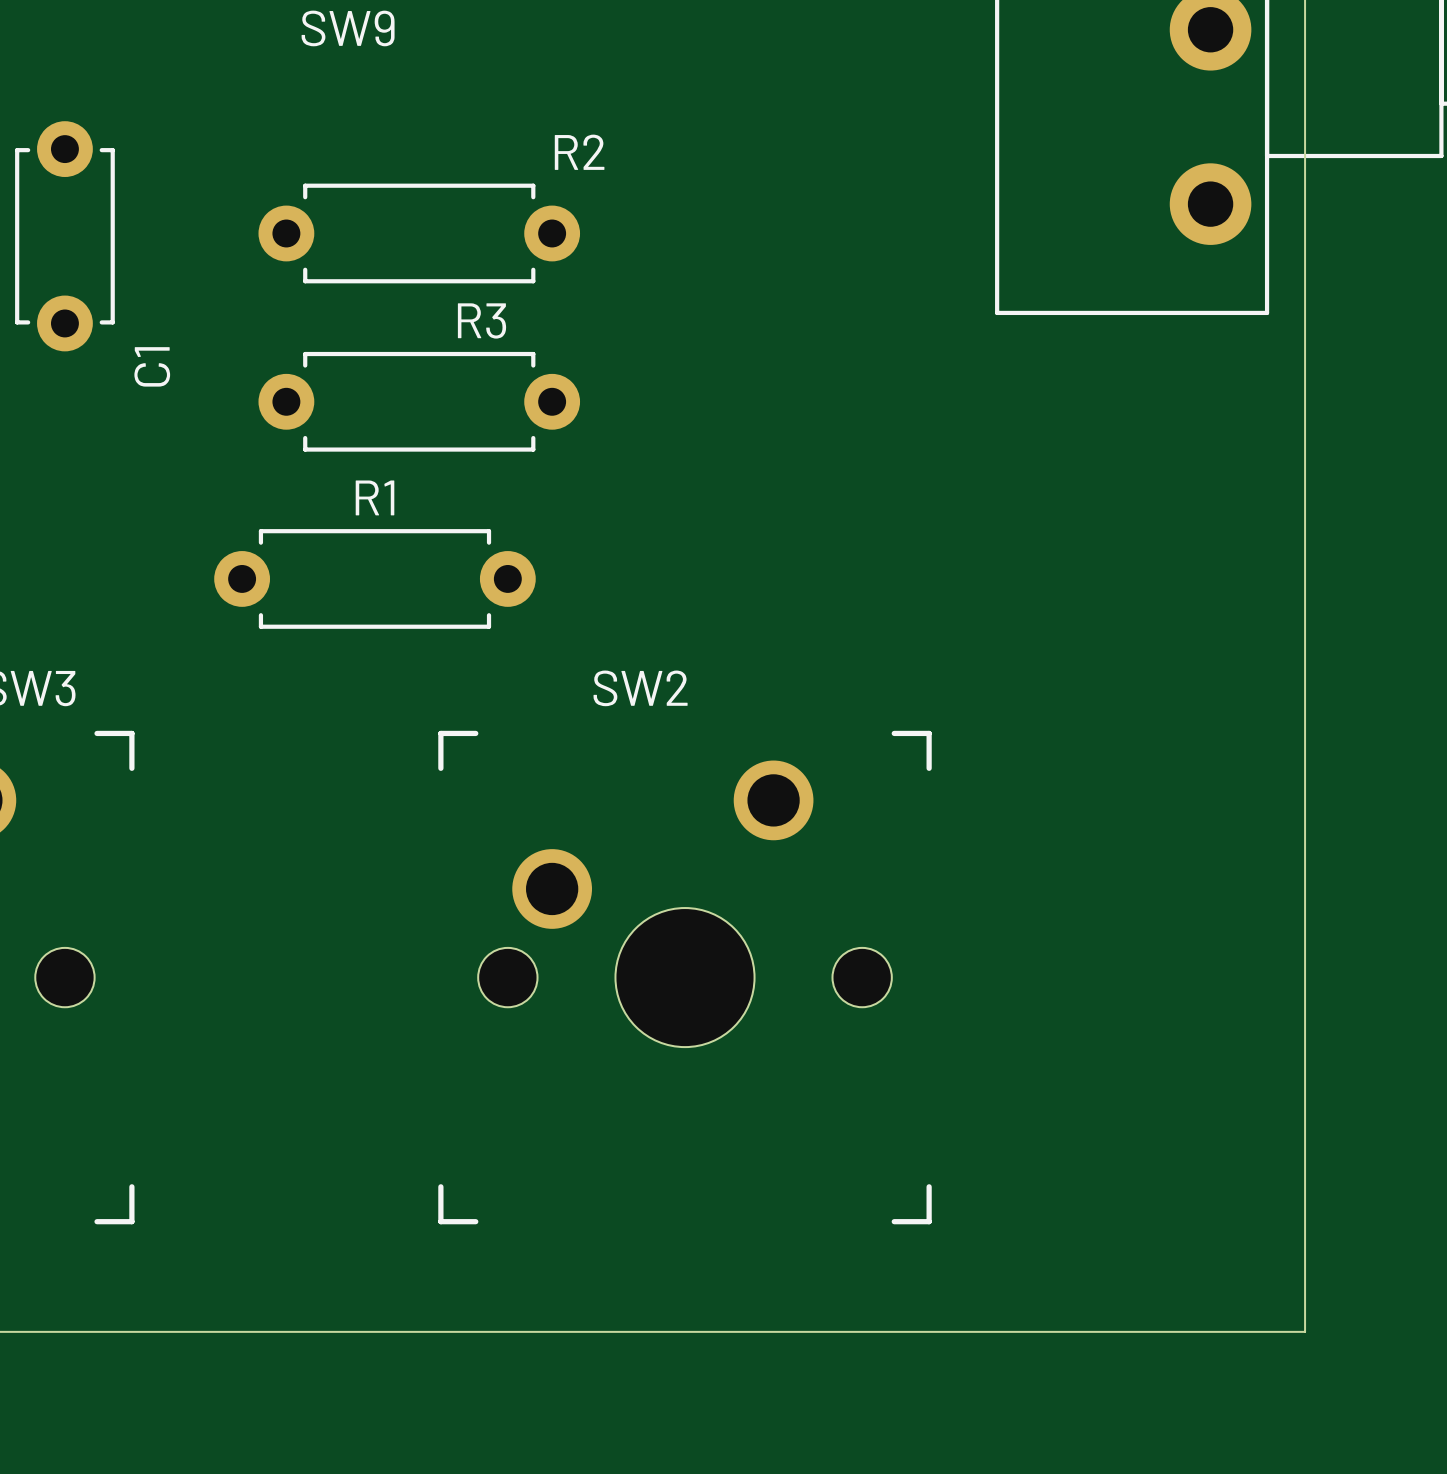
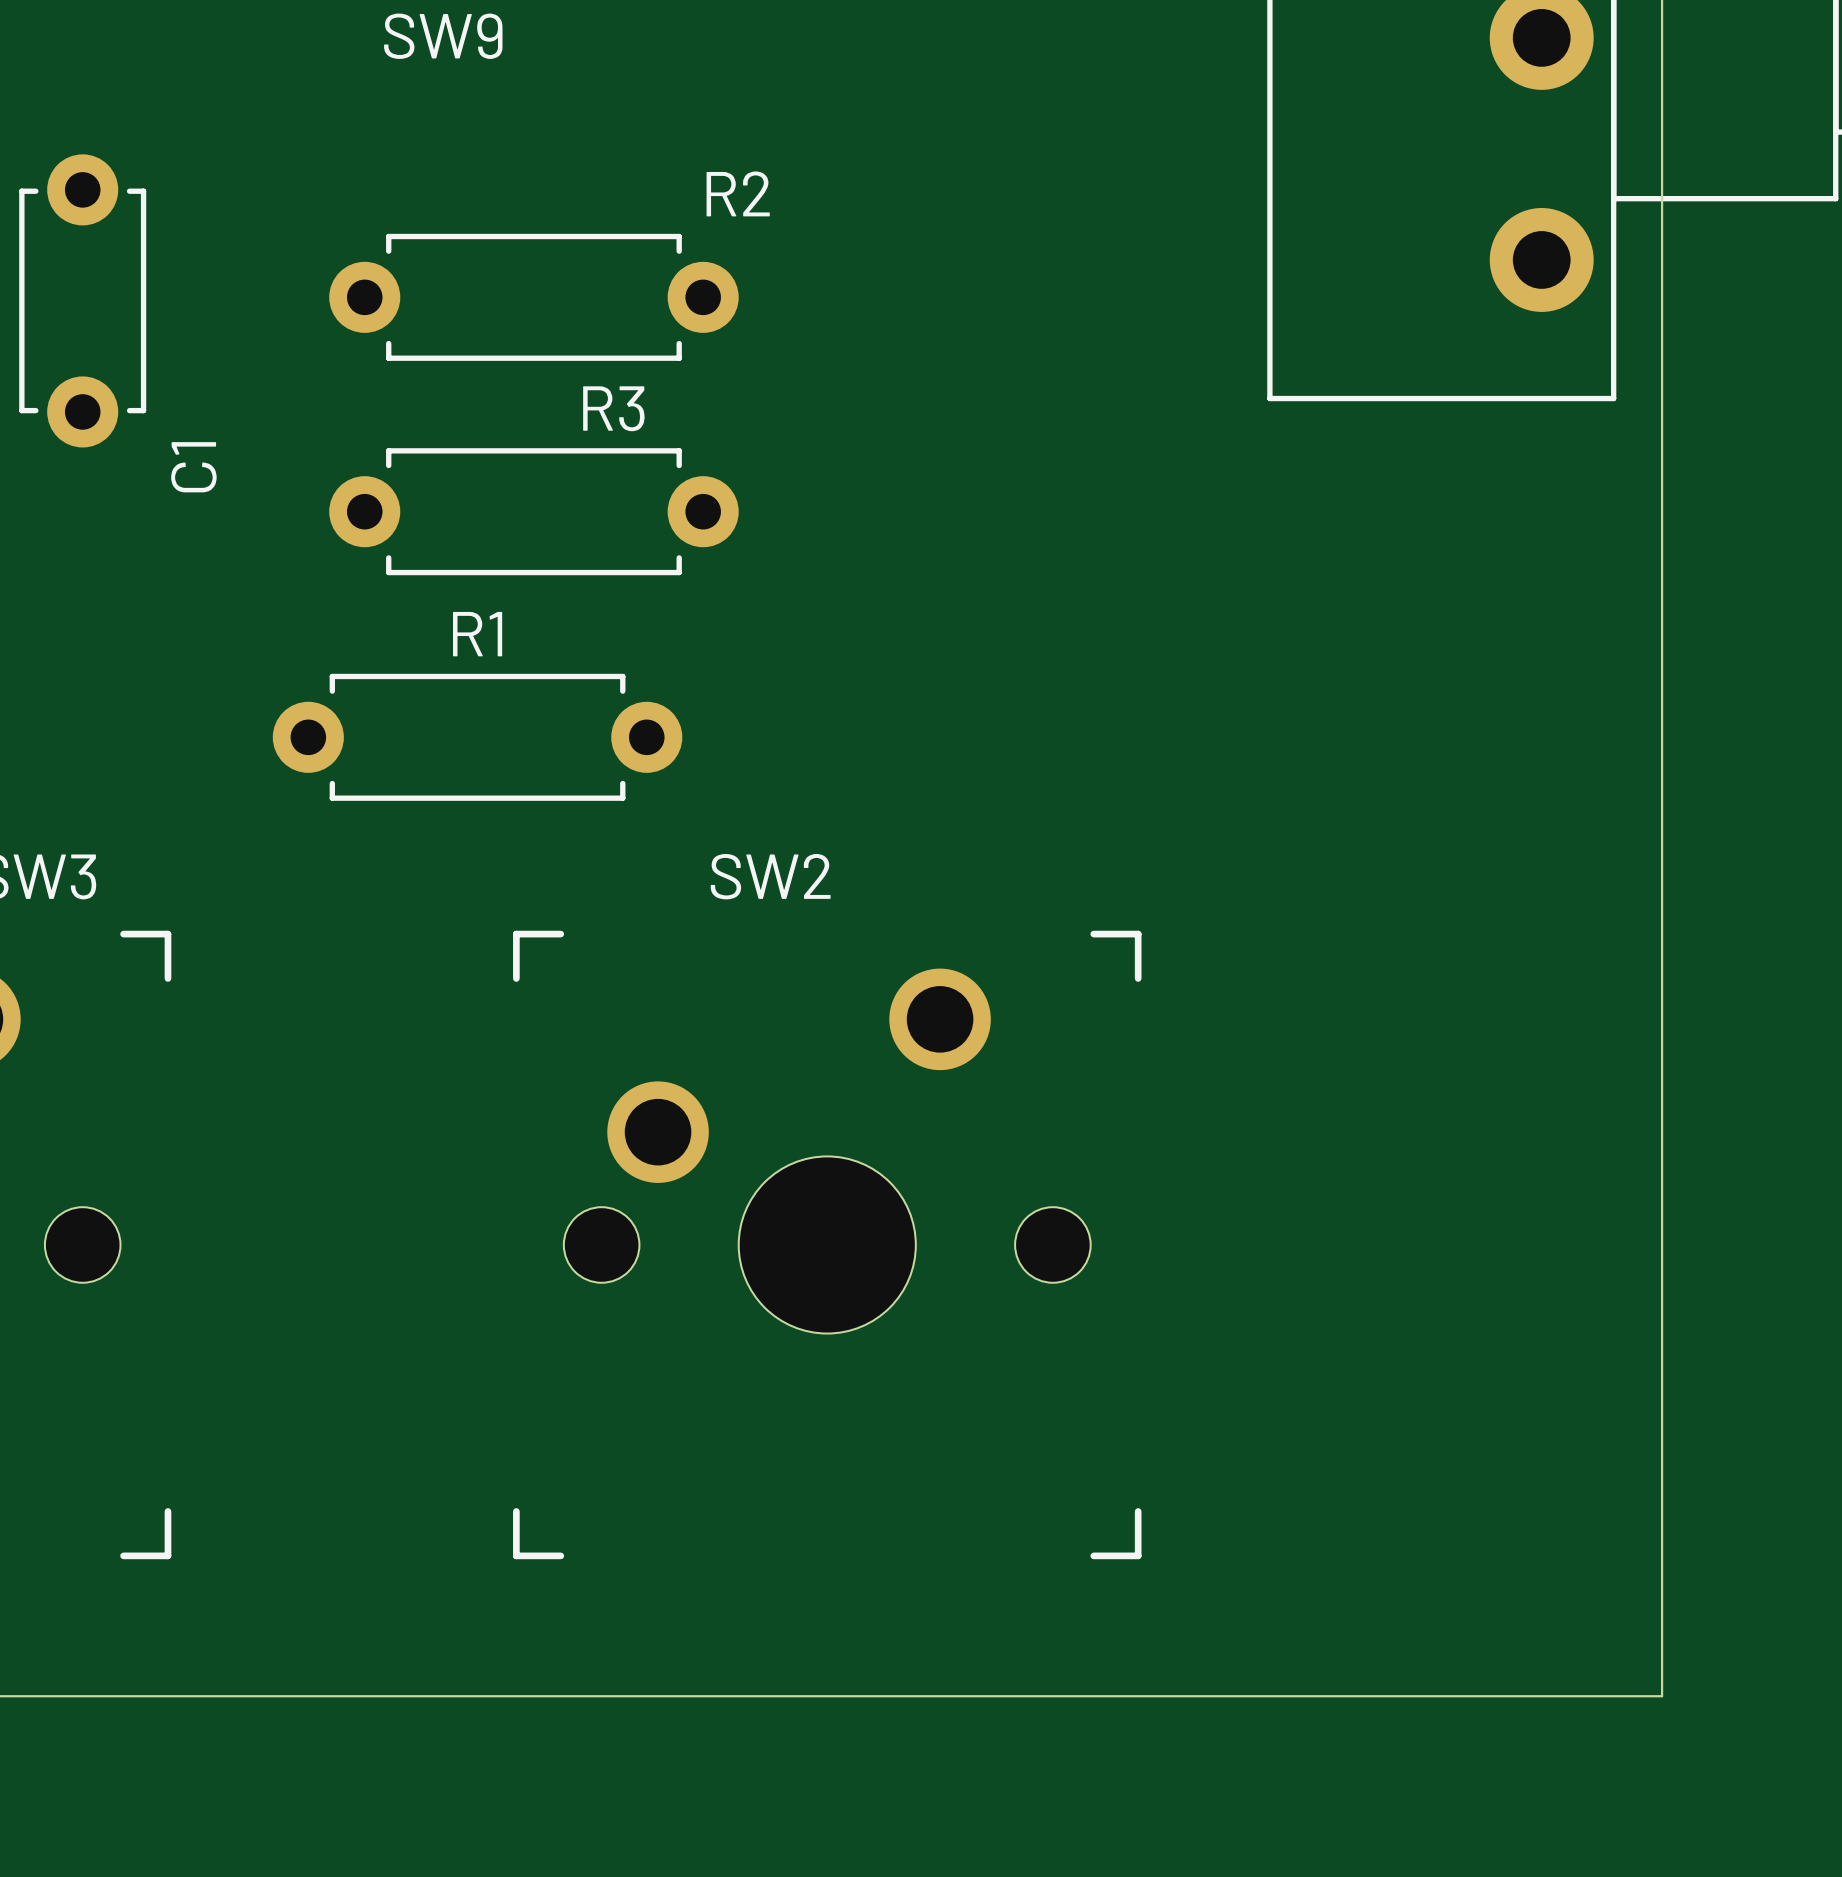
SW2 position: (685, 977) -> (827, 1244)

